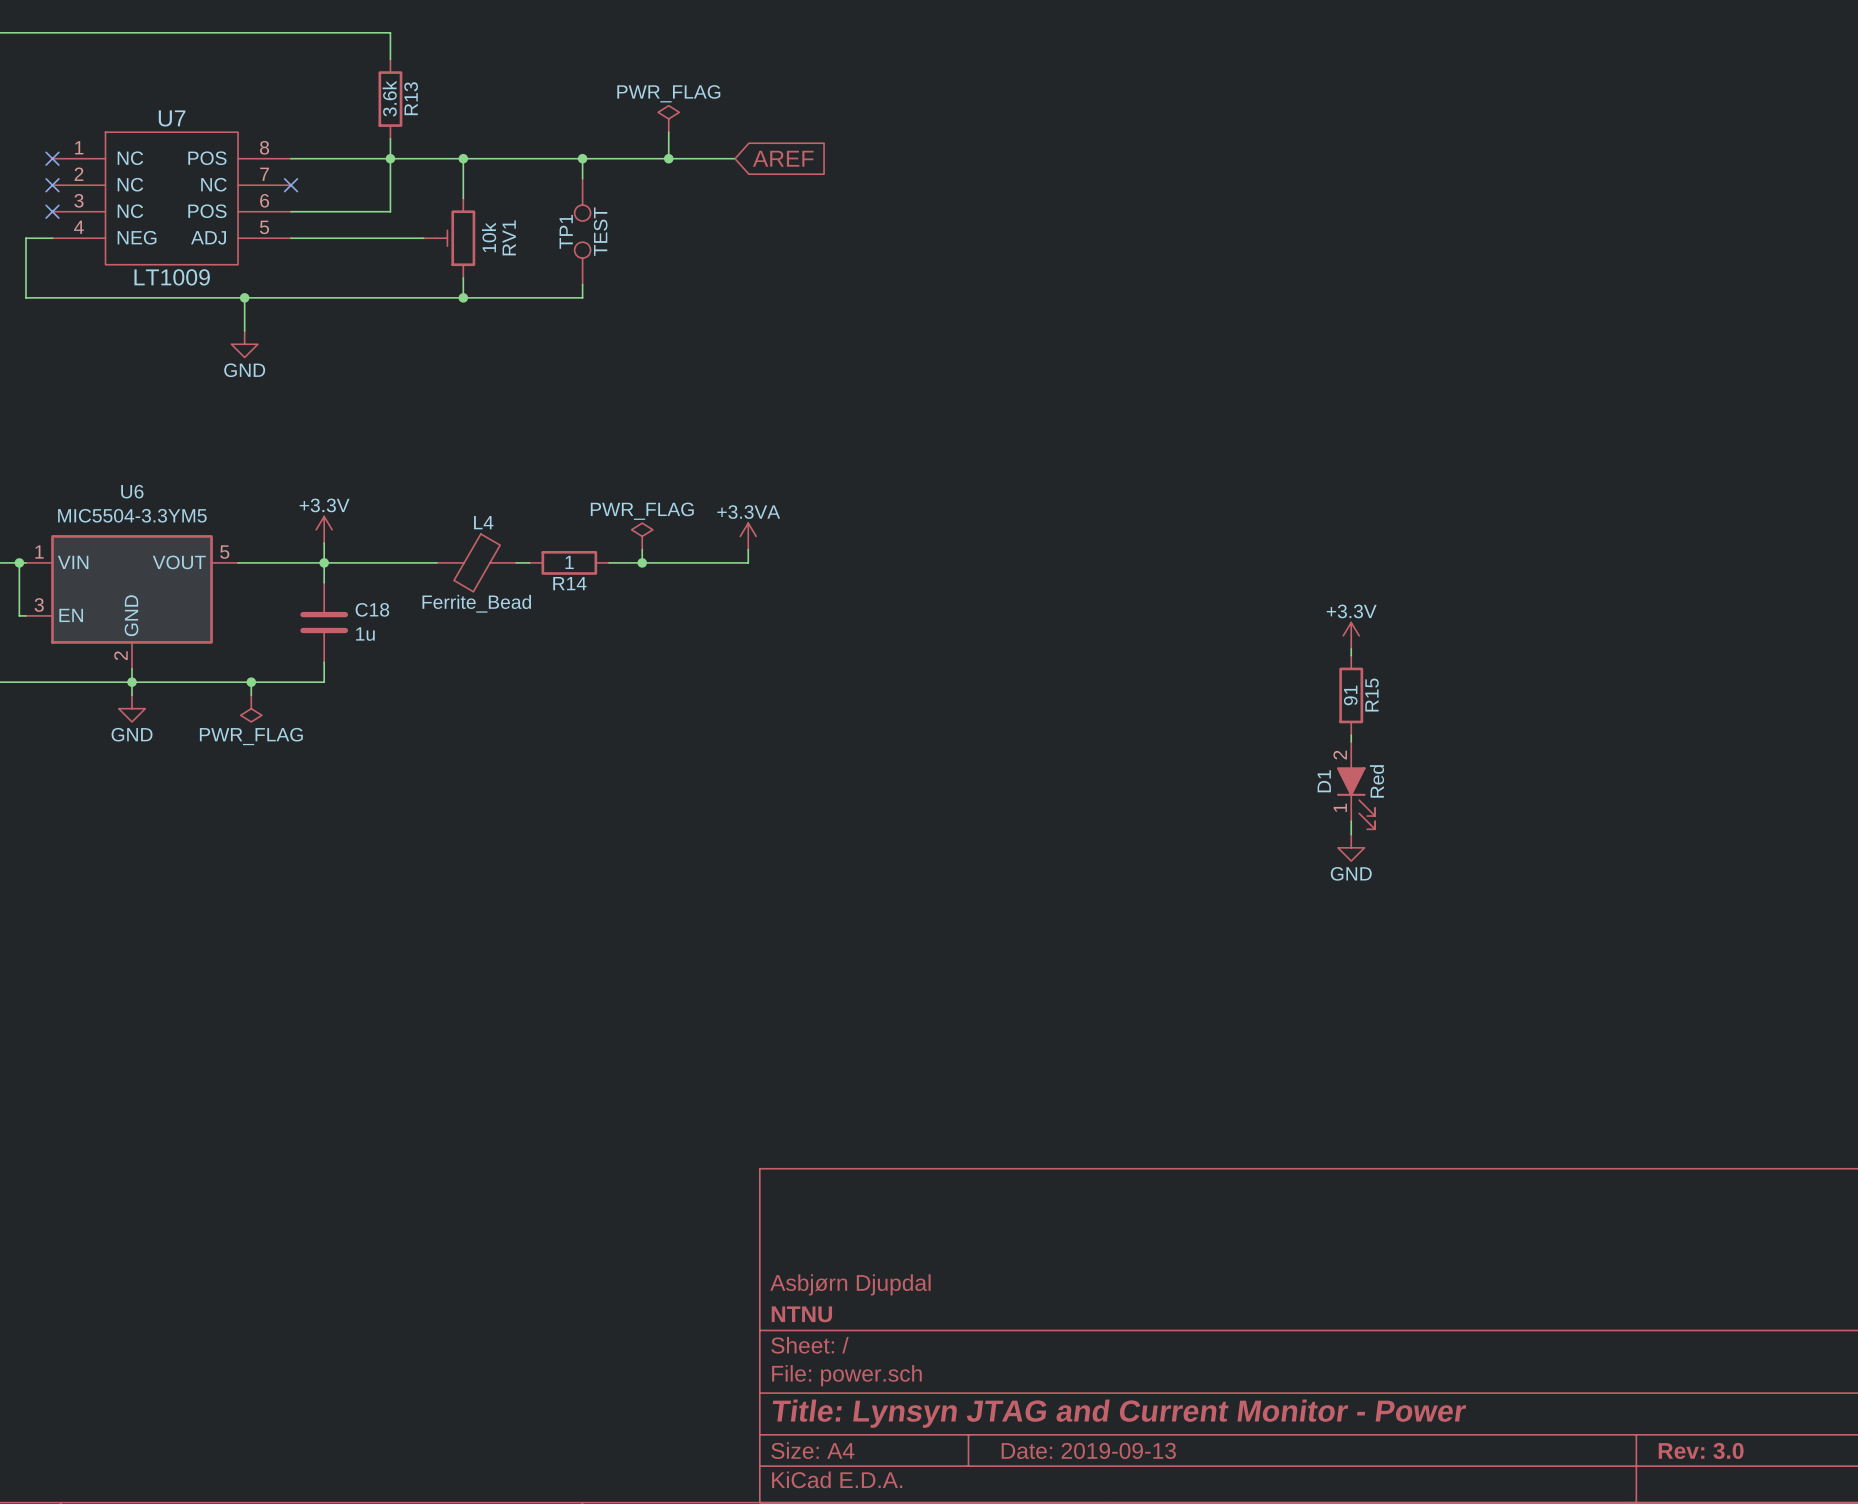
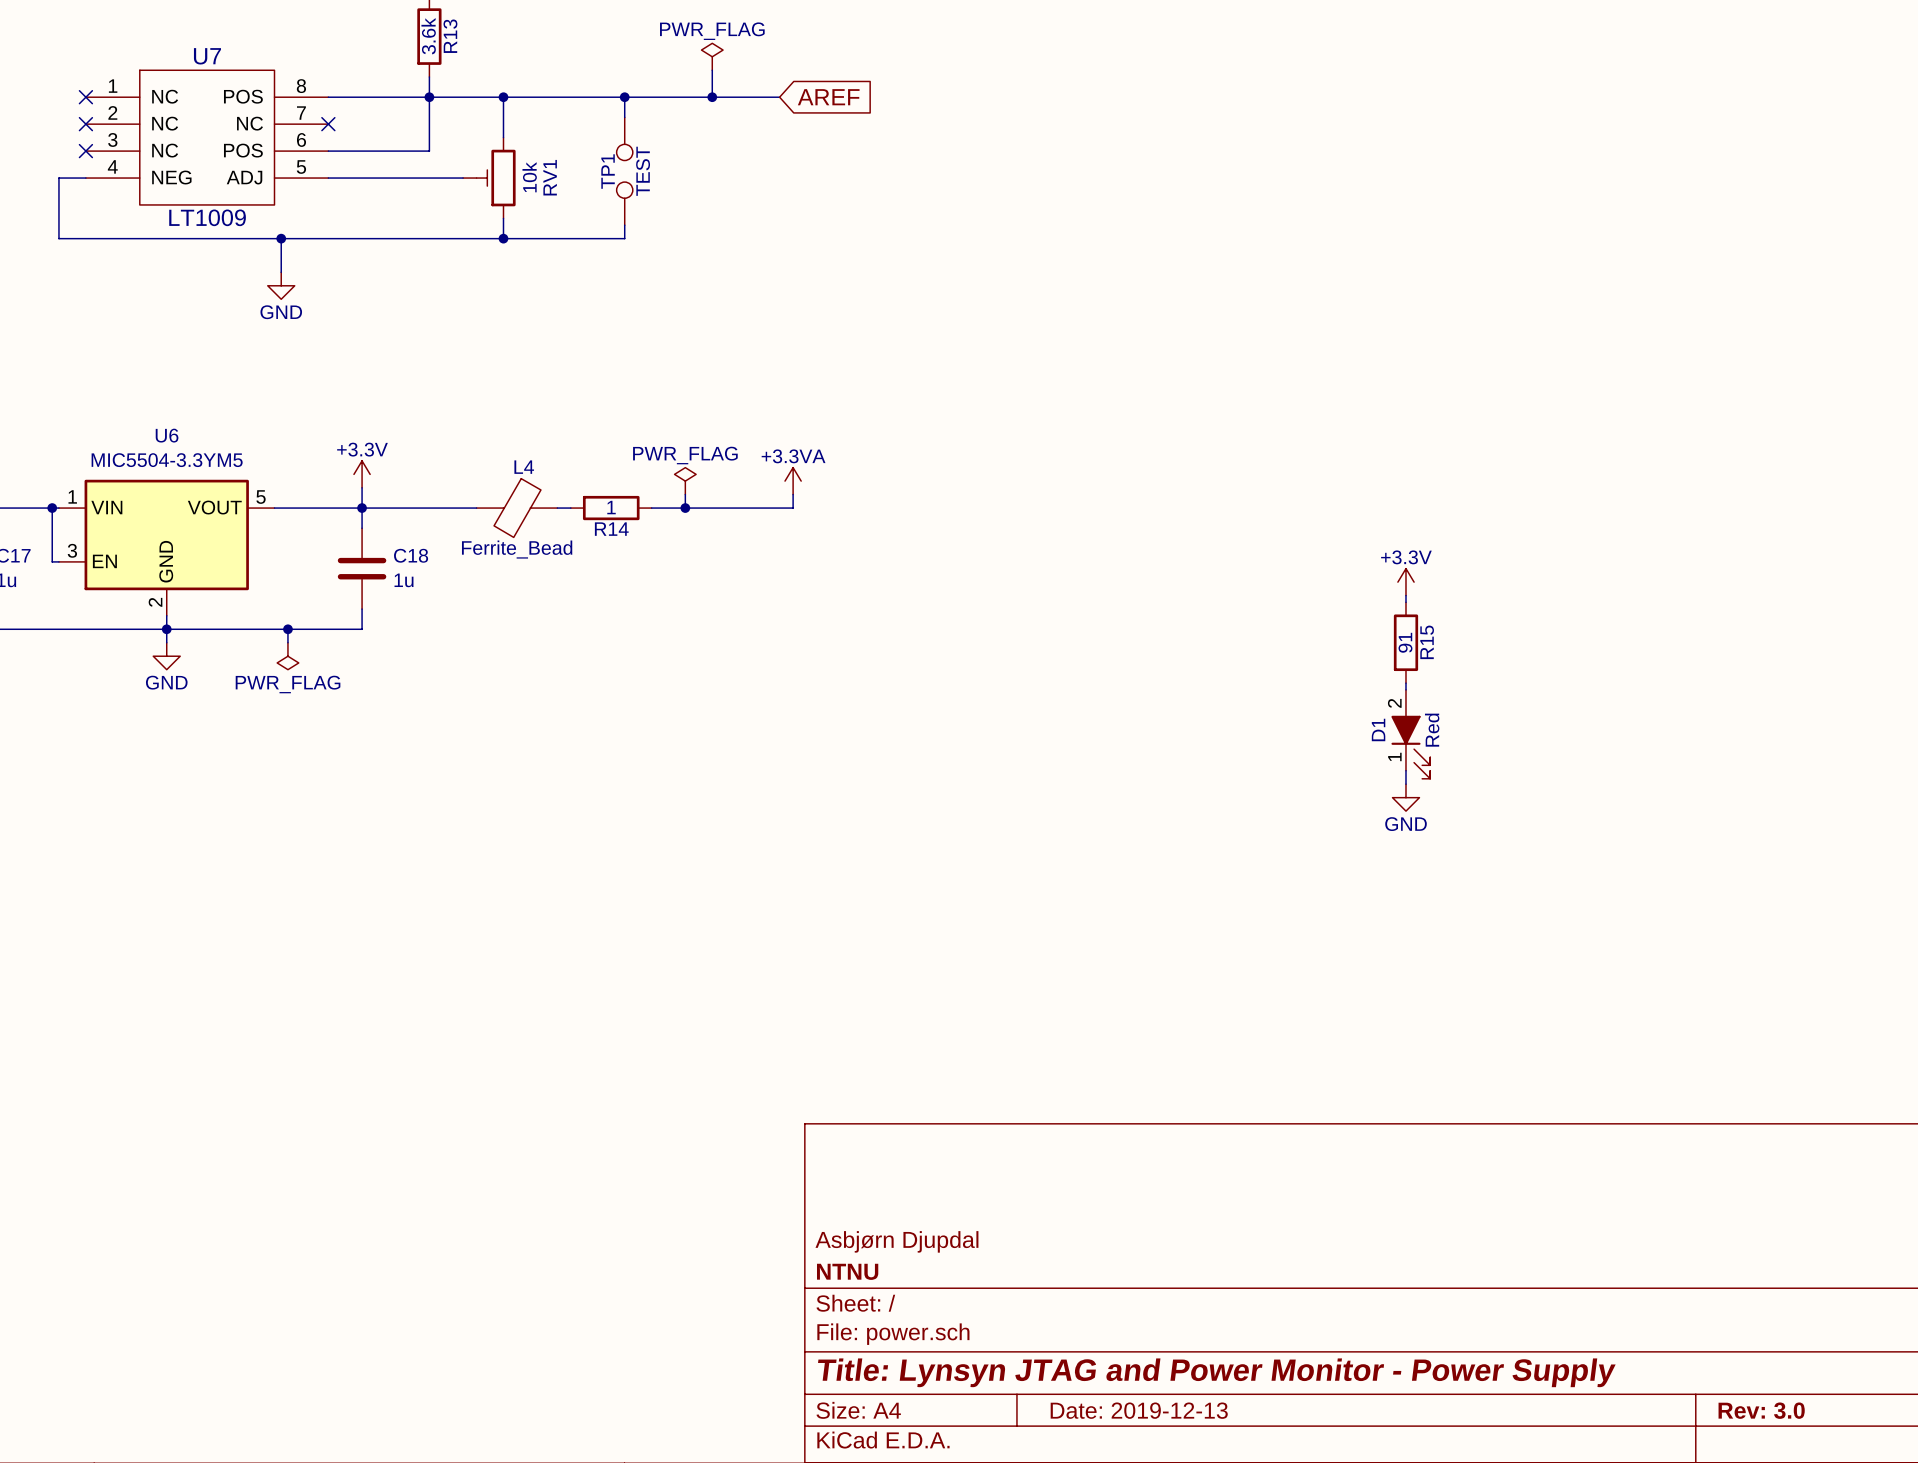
title block: Title: Lynsyn JTAG and Current Monitor - Power (1119, 1413) -> Title: Lynsyn JTAG and Power Monitor - Power Supply (1216, 1372)
title block: Date: 2019-09-13 (1088, 1450) -> Date: 2019-12-13 (1139, 1410)

